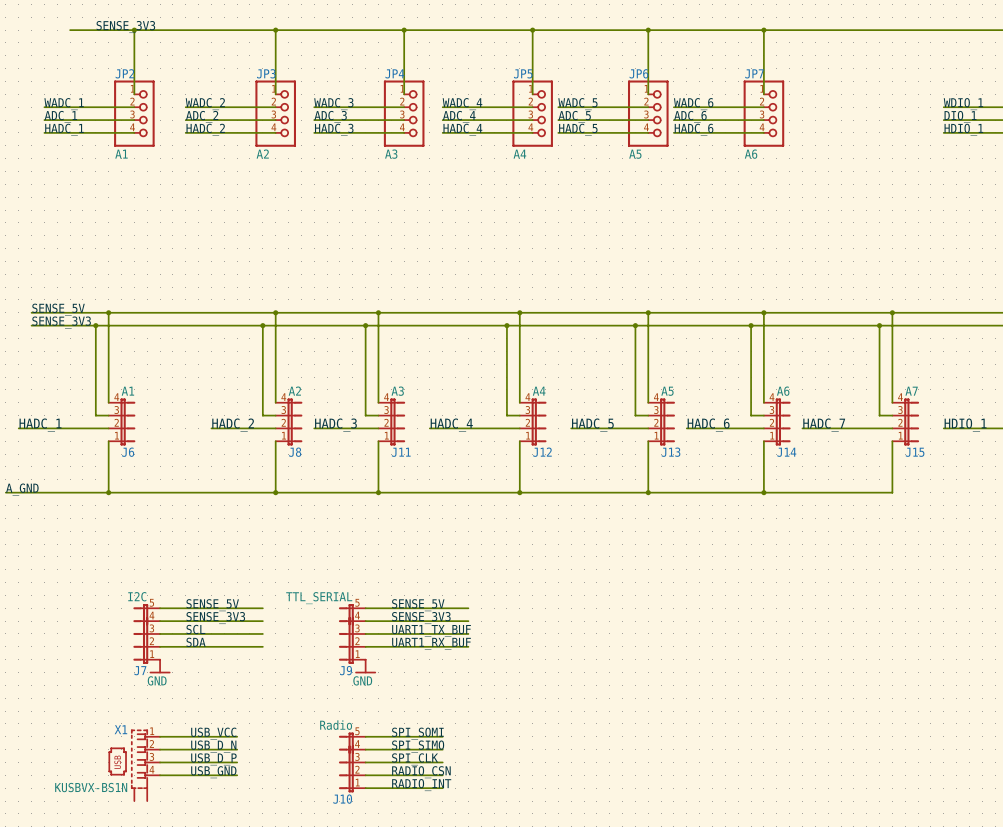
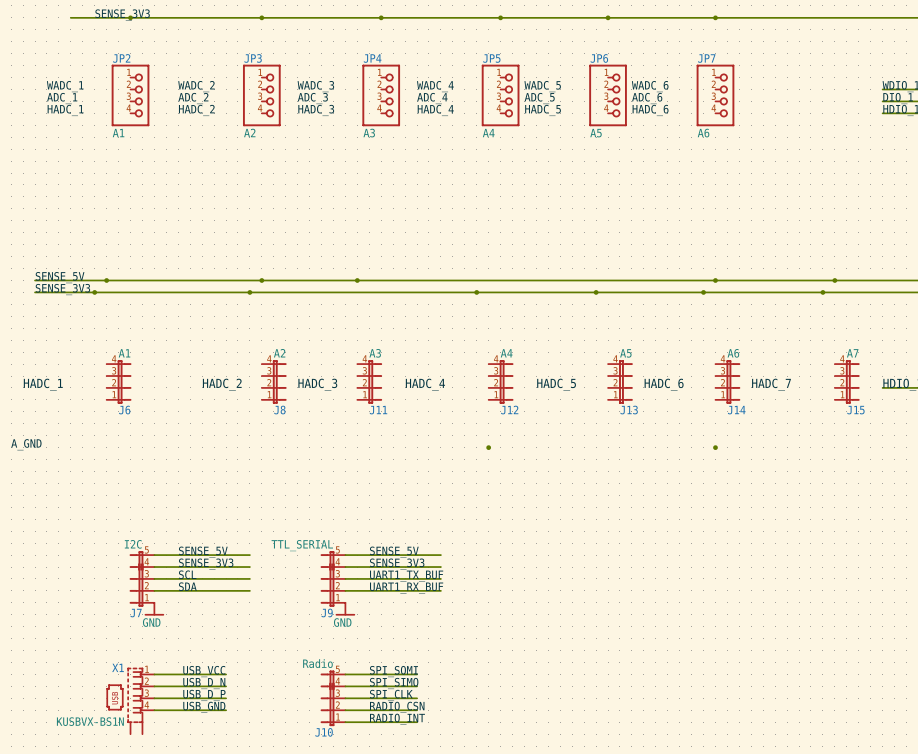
wire: (134, 30) (134, 94) -> none
wire: (275, 30) (275, 94) -> none
wire: (404, 30) (404, 94) -> none
wire: (532, 30) (532, 94) -> none
wire: (648, 30) (648, 94) -> none
wire: (763, 30) (763, 94) -> none
wire: (44, 107) (134, 107) -> none
wire: (185, 107) (275, 107) -> none
wire: (314, 107) (404, 107) -> none
wire: (442, 107) (532, 107) -> none
wire: (558, 107) (648, 107) -> none
wire: (673, 107) (763, 107) -> none
wire: (44, 120) (134, 120) -> none
wire: (185, 120) (275, 120) -> none
wire: (314, 120) (404, 120) -> none
wire: (442, 120) (532, 120) -> none
wire: (558, 120) (648, 120) -> none
wire: (673, 120) (763, 120) -> none
wire: (44, 132) (134, 132) -> none
wire: (185, 132) (275, 132) -> none
wire: (314, 132) (404, 132) -> none
wire: (442, 132) (532, 132) -> none
wire: (558, 132) (648, 132) -> none
wire: (673, 132) (763, 132) -> none
wire: (108, 312) (108, 402) -> none
wire: (275, 312) (275, 402) -> none
wire: (378, 312) (378, 402) -> none
wire: (519, 312) (519, 402) -> none
junction: (519, 312) -> none
wire: (648, 312) (648, 402) -> none
junction: (648, 312) -> none
wire: (763, 312) (763, 402) -> none
wire: (892, 312) (892, 402) -> none
wire: (95, 325) (95, 415) (108, 415) -> none
wire: (262, 325) (262, 415) (275, 415) -> none
wire: (365, 325) (365, 415) (378, 415) -> none
junction: (365, 325) -> none
wire: (506, 325) (506, 415) (519, 415) -> none
wire: (635, 325) (635, 415) (648, 415) -> none
wire: (751, 325) (751, 415) (763, 415) -> none
wire: (879, 325) (879, 415) (892, 415) -> none
wire: (18, 428) (108, 428) -> none
wire: (211, 428) (275, 428) -> none
wire: (314, 428) (378, 428) -> none
wire: (429, 428) (519, 428) -> none
wire: (571, 428) (648, 428) -> none
wire: (686, 428) (763, 428) -> none
wire: (802, 428) (892, 428) -> none
wire: (108, 441) (108, 492) -> none
wire: (275, 441) (275, 492) -> none
wire: (378, 441) (378, 492) -> none
wire: (519, 441) (519, 492) -> none
wire: (648, 441) (648, 492) -> none
wire: (763, 441) (763, 492) -> none
wire: (892, 441) (892, 492) (5, 492) -> none
junction: (108, 492) -> none
junction: (275, 492) -> none
junction: (378, 492) -> none
junction: (648, 492) -> none

